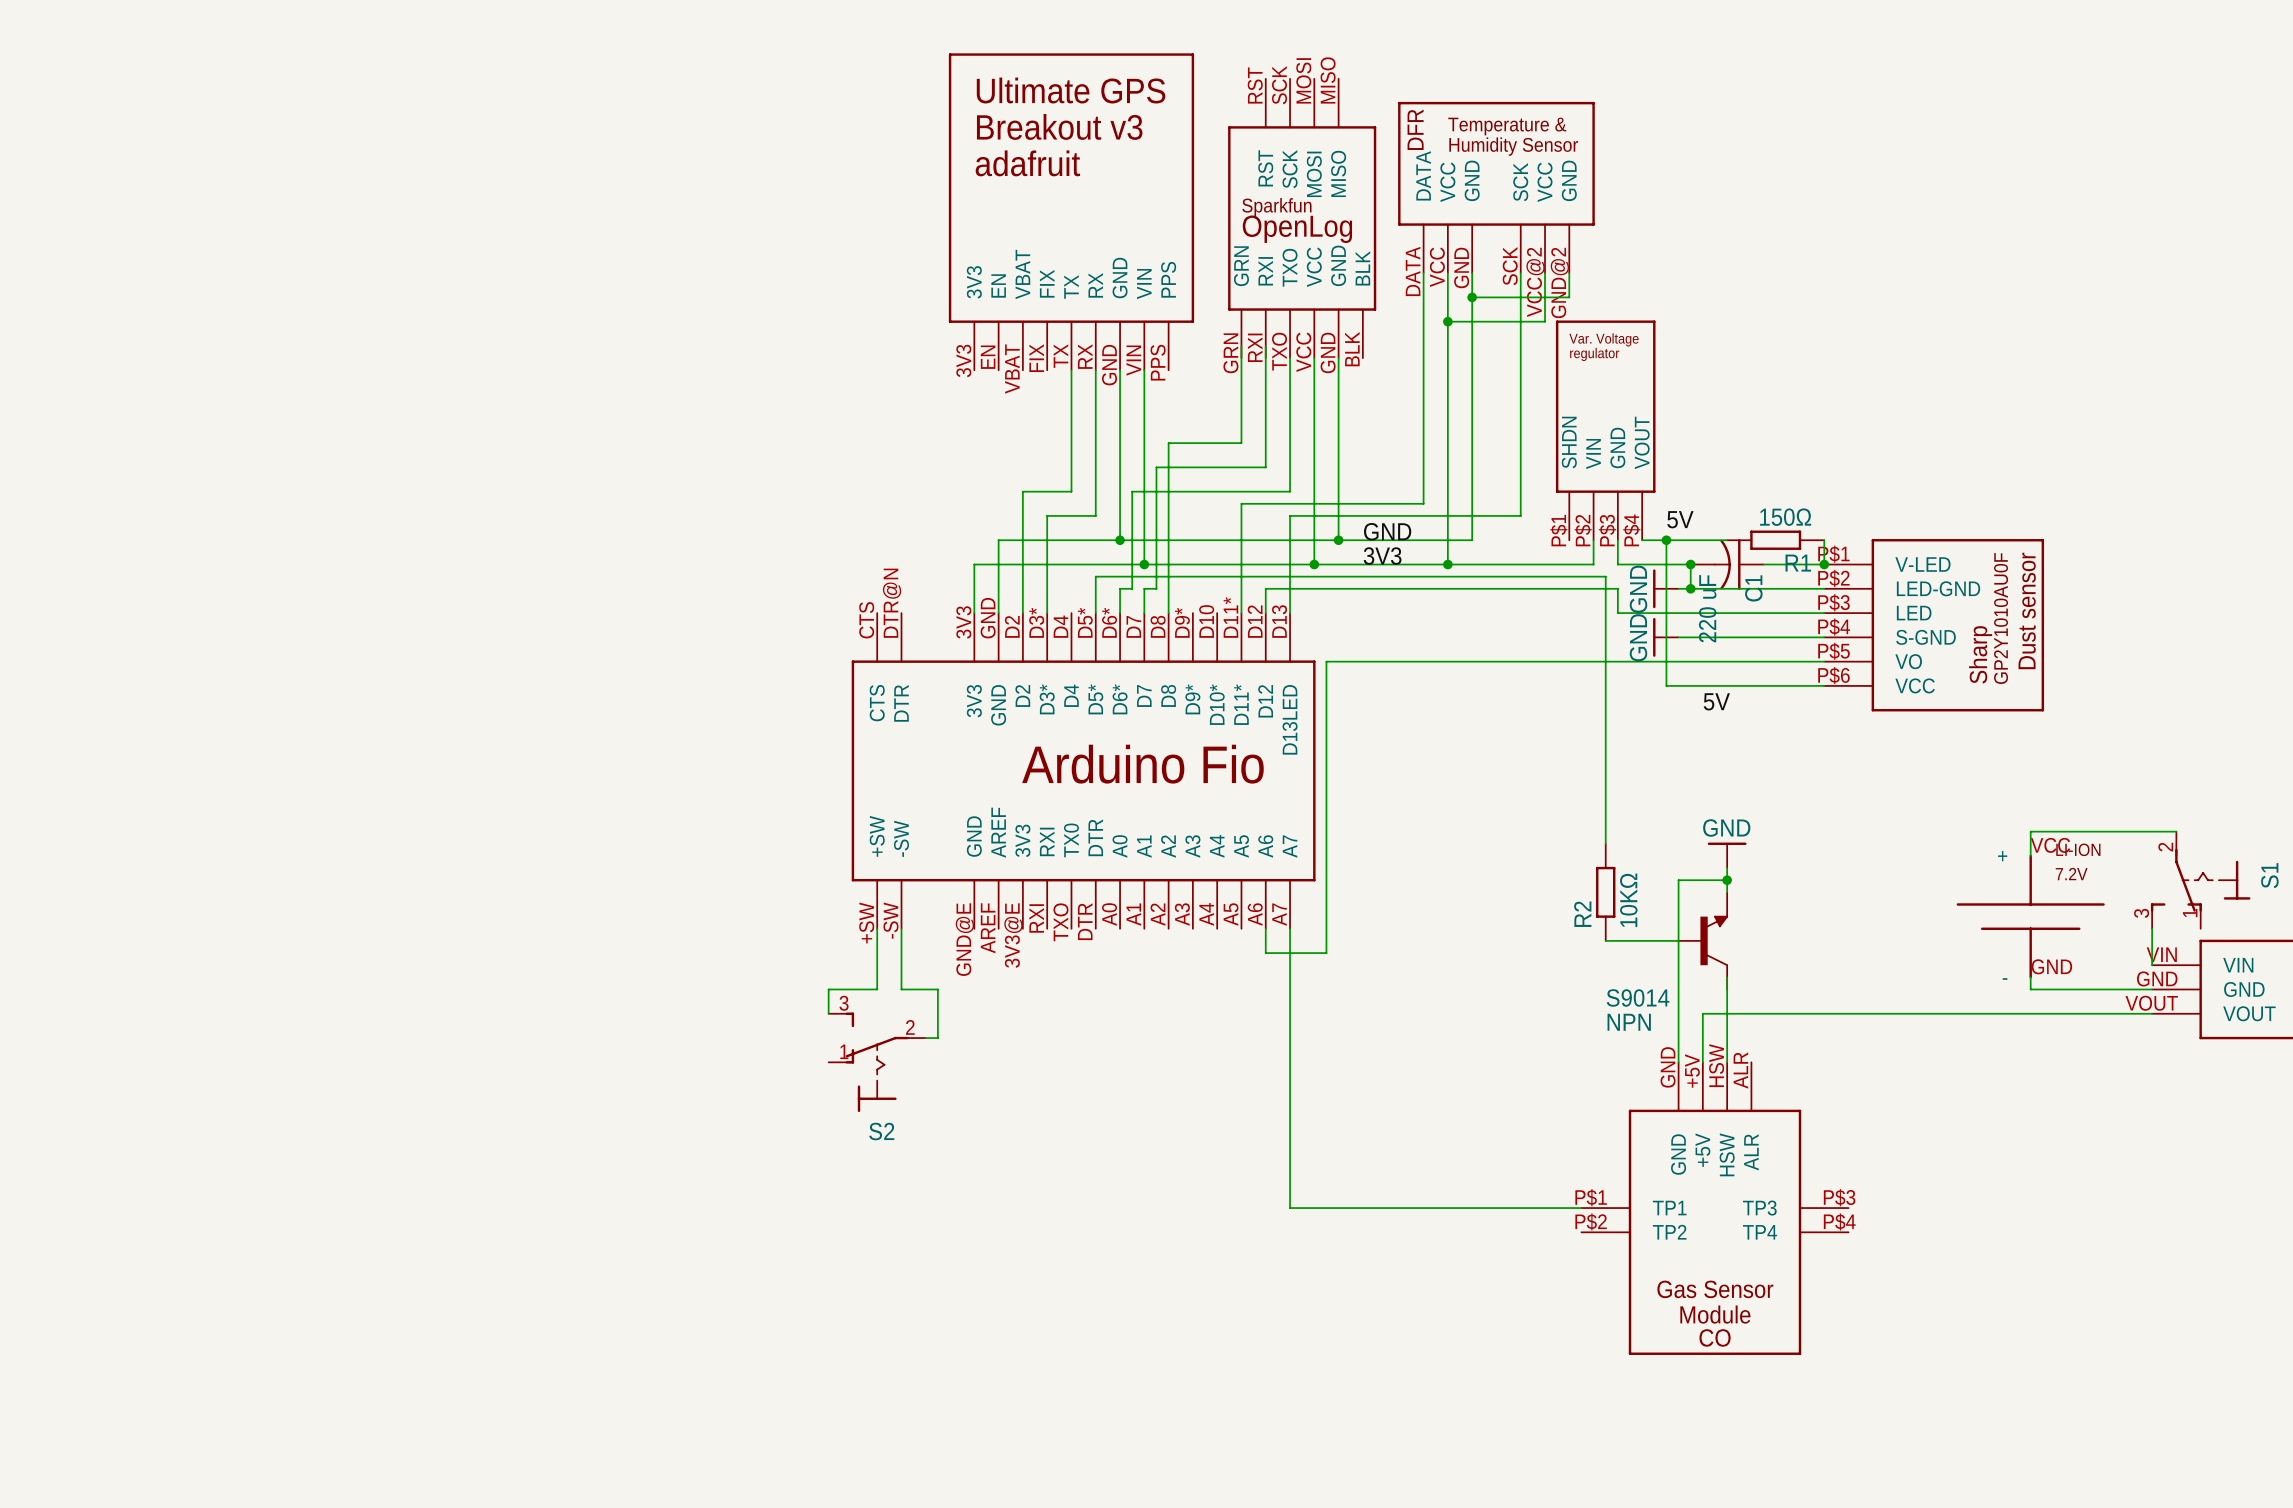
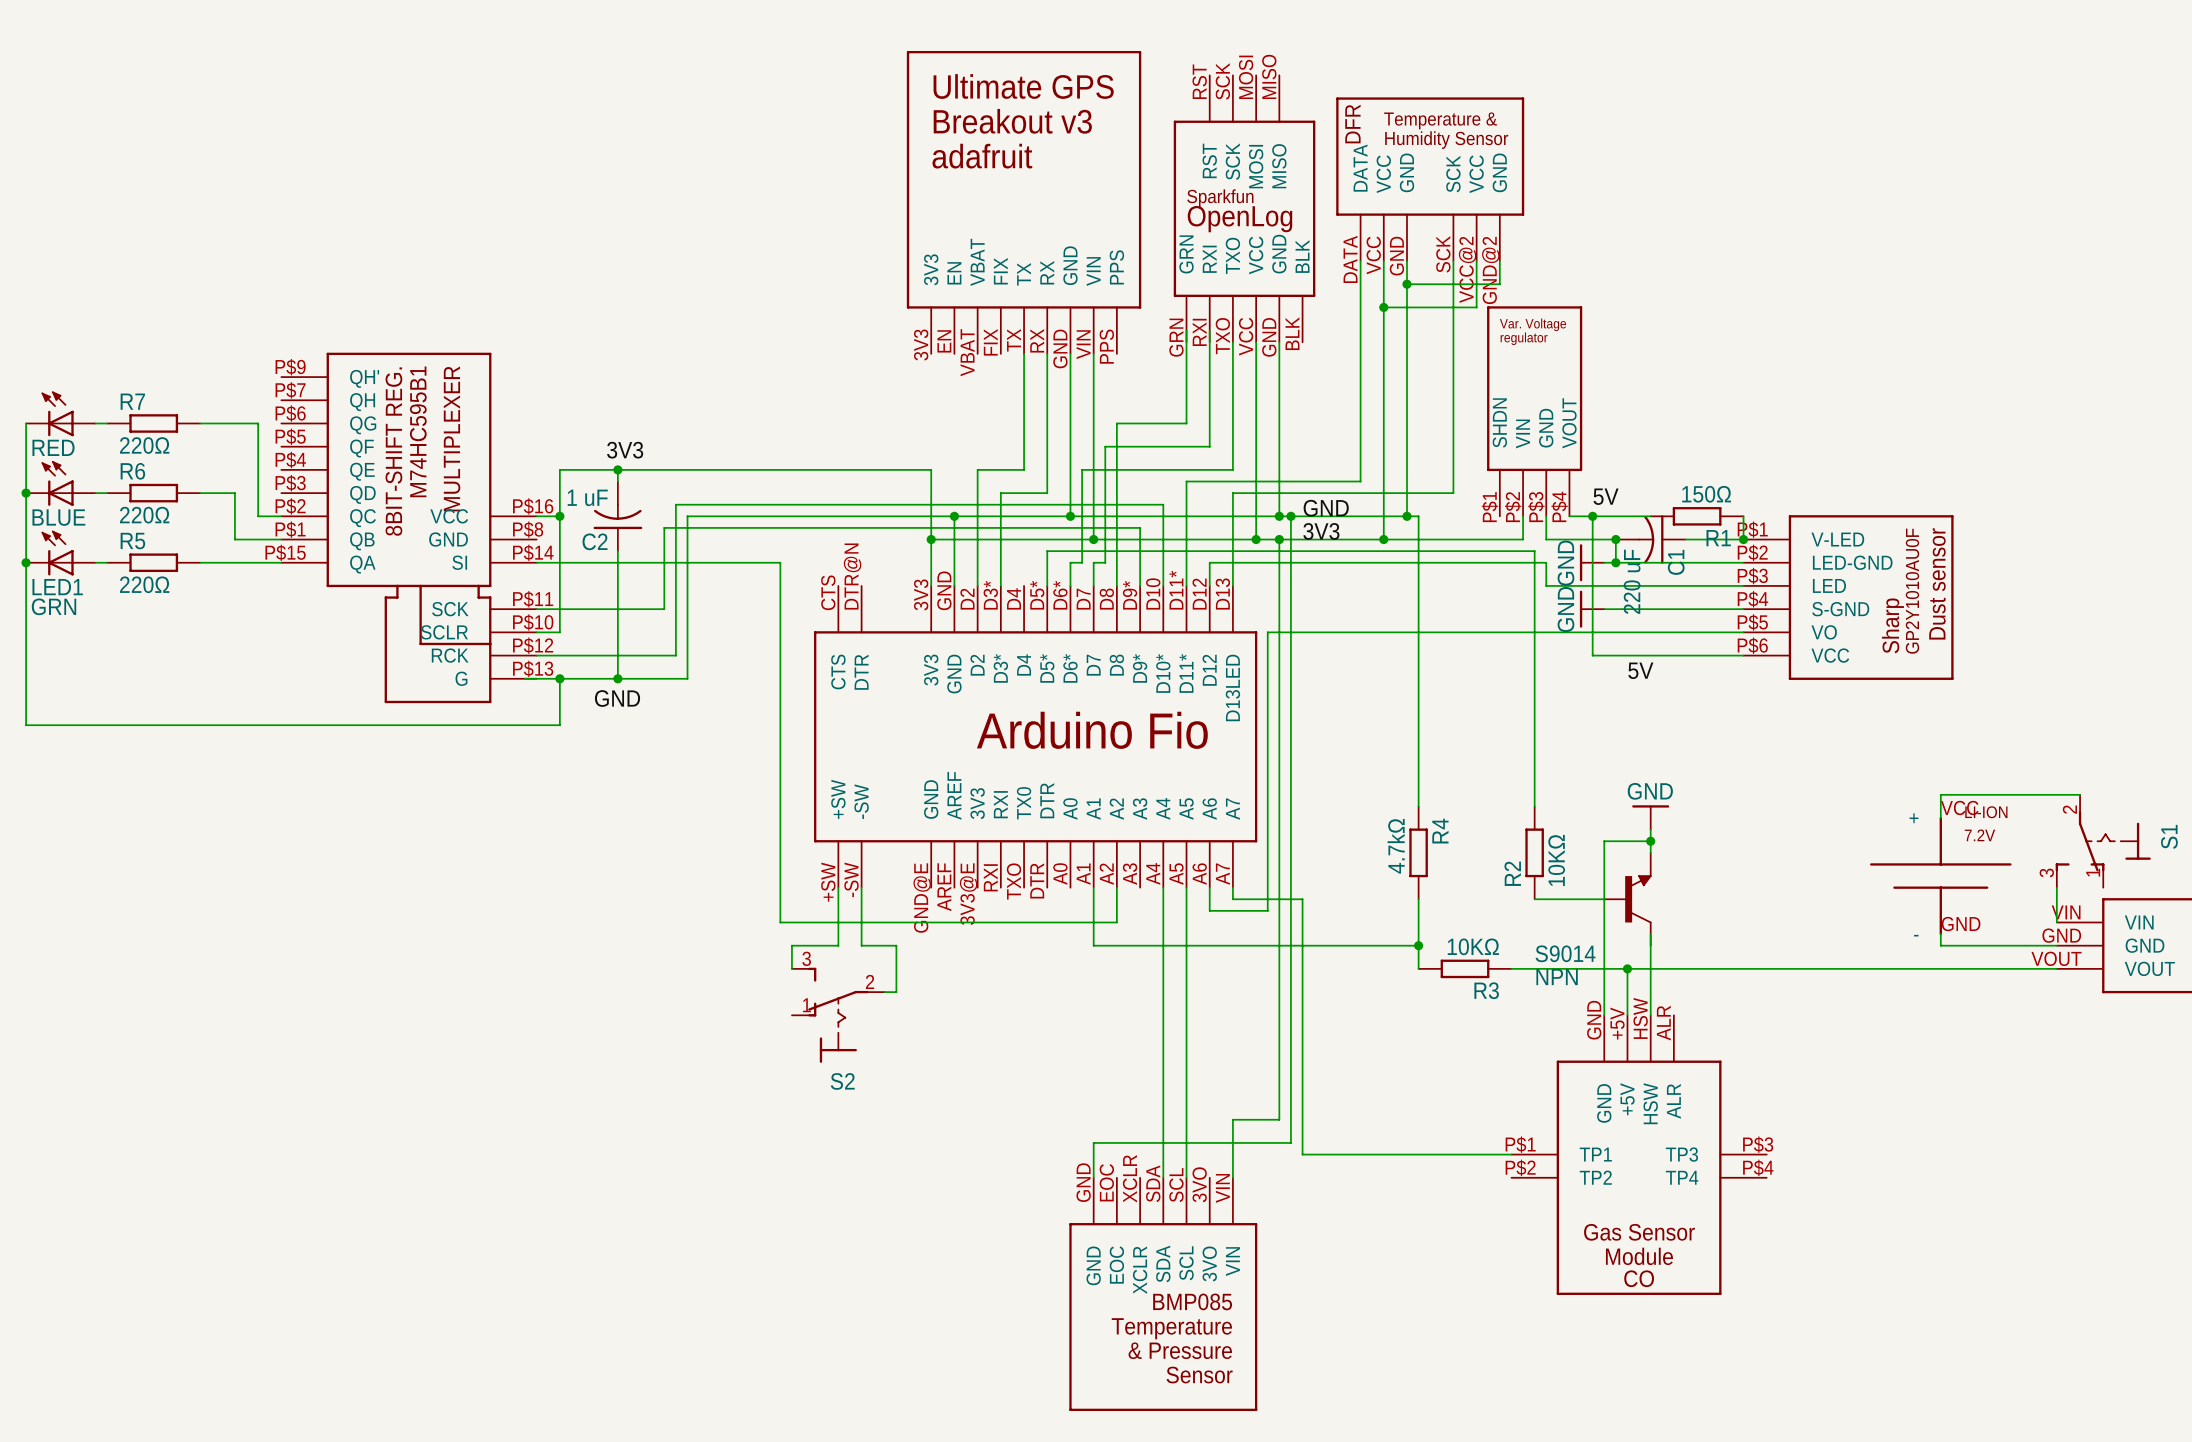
RED: none -> (60, 413)
wire: none -> (26, 423) (26, 725) (559, 725) (559, 678)
wire: none -> (95, 423) (107, 423)
R7: none -> 220Ω (153, 423)
wire: none -> (200, 423) (258, 423) (258, 516) (281, 516)
label: none -> 3V3 (625, 450)
wire: none -> (617, 469) (617, 481)
junction: none -> (617, 469)
BLUE: none -> (60, 483)
junction: none -> (26, 493)
wire: none -> (95, 493) (107, 493)
R6: none -> 220Ω (153, 493)
wire: none -> (200, 493) (234, 493) (234, 539) (281, 539)
wire: none -> (536, 516) (559, 516)
junction: none -> (559, 516)
C2: none -> 1 uF (617, 516)
wire: none -> (954, 516) (687, 516) (687, 678) (525, 678)
junction: none -> (954, 516)
wire: none -> (1290, 516) (1290, 1142) (1093, 1142) (1093, 1177)
junction: none -> (1290, 516)
wire: none -> (1406, 516) (1418, 516) (1418, 806)
junction: none -> (1406, 516)
part: none -> (409, 527)
wire: none -> (931, 539) (931, 469) (559, 469) (559, 632) (536, 632)
junction: none -> (931, 539)
wire: none -> (1279, 539) (1279, 1119) (1232, 1119)
junction: none -> (1279, 539)
wire: none -> (617, 551) (617, 678)
LED1: none -> GRN (60, 553)
junction: none -> (26, 562)
wire: none -> (95, 562) (107, 562)
R5: none -> 220Ω (153, 562)
wire: none -> (200, 562) (281, 562)
wire: none -> (536, 562) (780, 562) (780, 922) (1116, 922) (1116, 887)
wire: none -> (1140, 585) (1140, 527) (664, 527) (664, 609) (536, 609)
wire: none -> (1163, 585) (1163, 504) (675, 504) (675, 655) (536, 655)
junction: none -> (559, 678)
junction: none -> (617, 678)
label: none -> GND (617, 698)
R4: none -> 4.7kΩ (1418, 852)
wire: none -> (1093, 887) (1093, 945) (1418, 945)
wire: none -> (1163, 887) (1163, 1177)
wire: none -> (1186, 887) (1186, 1177)
wire: (1290, 940) (1290, 1171) -> (1232, 899) (1302, 899) (1302, 1154)
wire: none -> (1418, 899) (1418, 968)
junction: none -> (1418, 945)
R3: none -> 10KΩ (1465, 968)
wire: none -> (1511, 968) (1627, 968)
junction: none -> (1627, 968)
wire: (1290, 1208) (1362, 1208) -> (1232, 1154) (1232, 1177)
part: none -> (1163, 1294)

